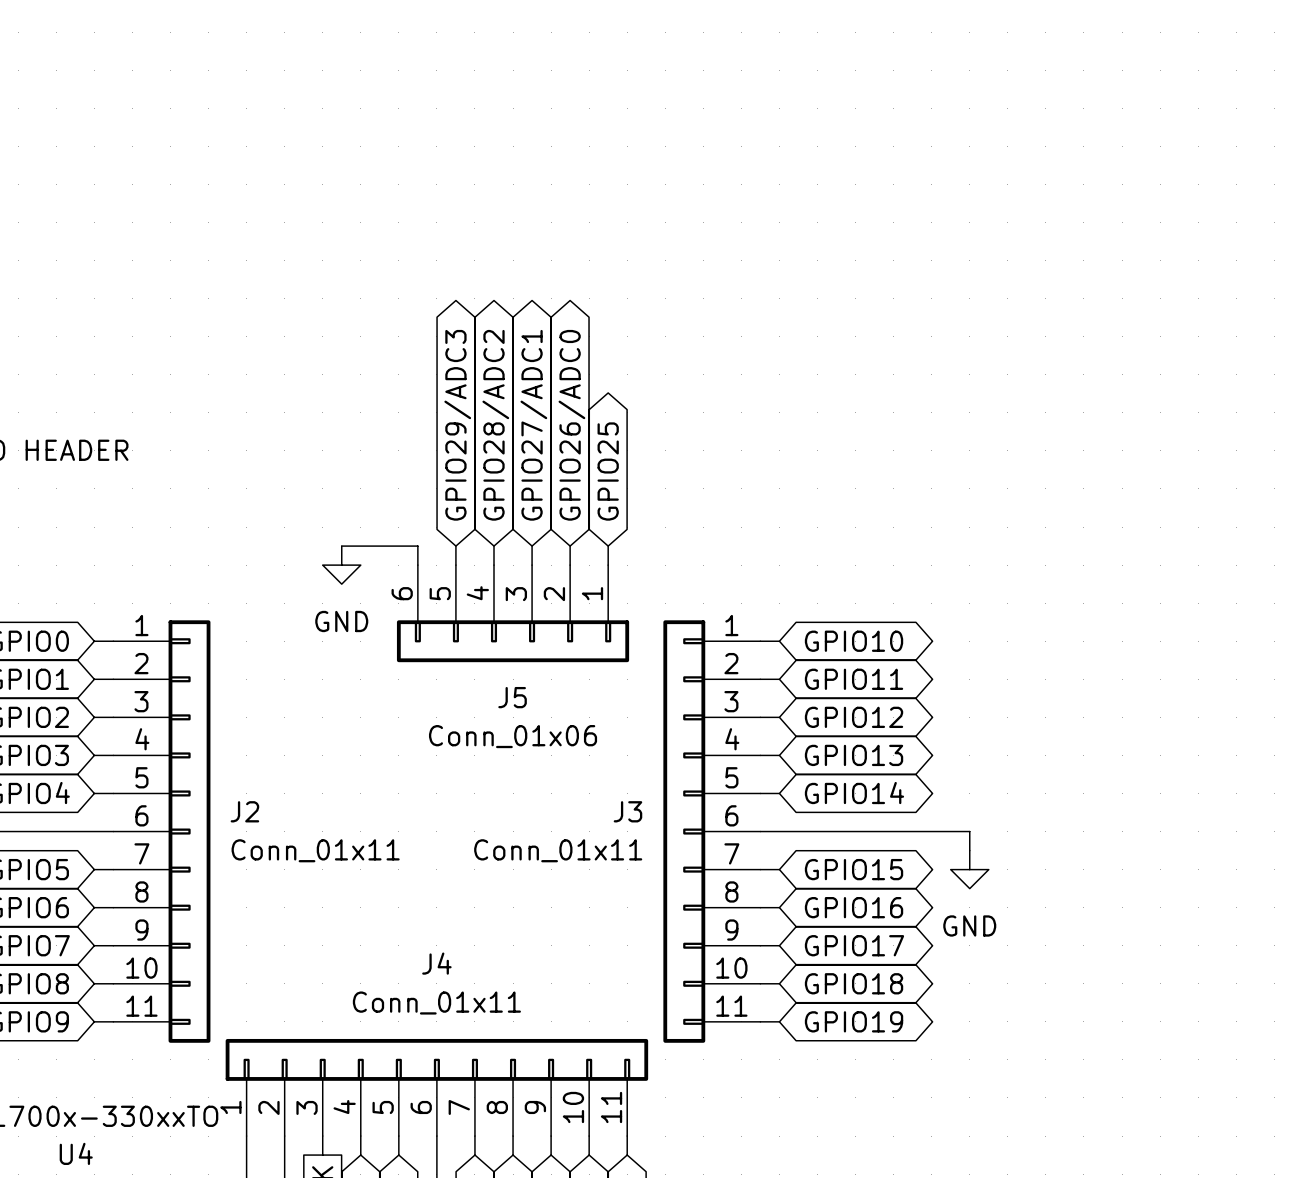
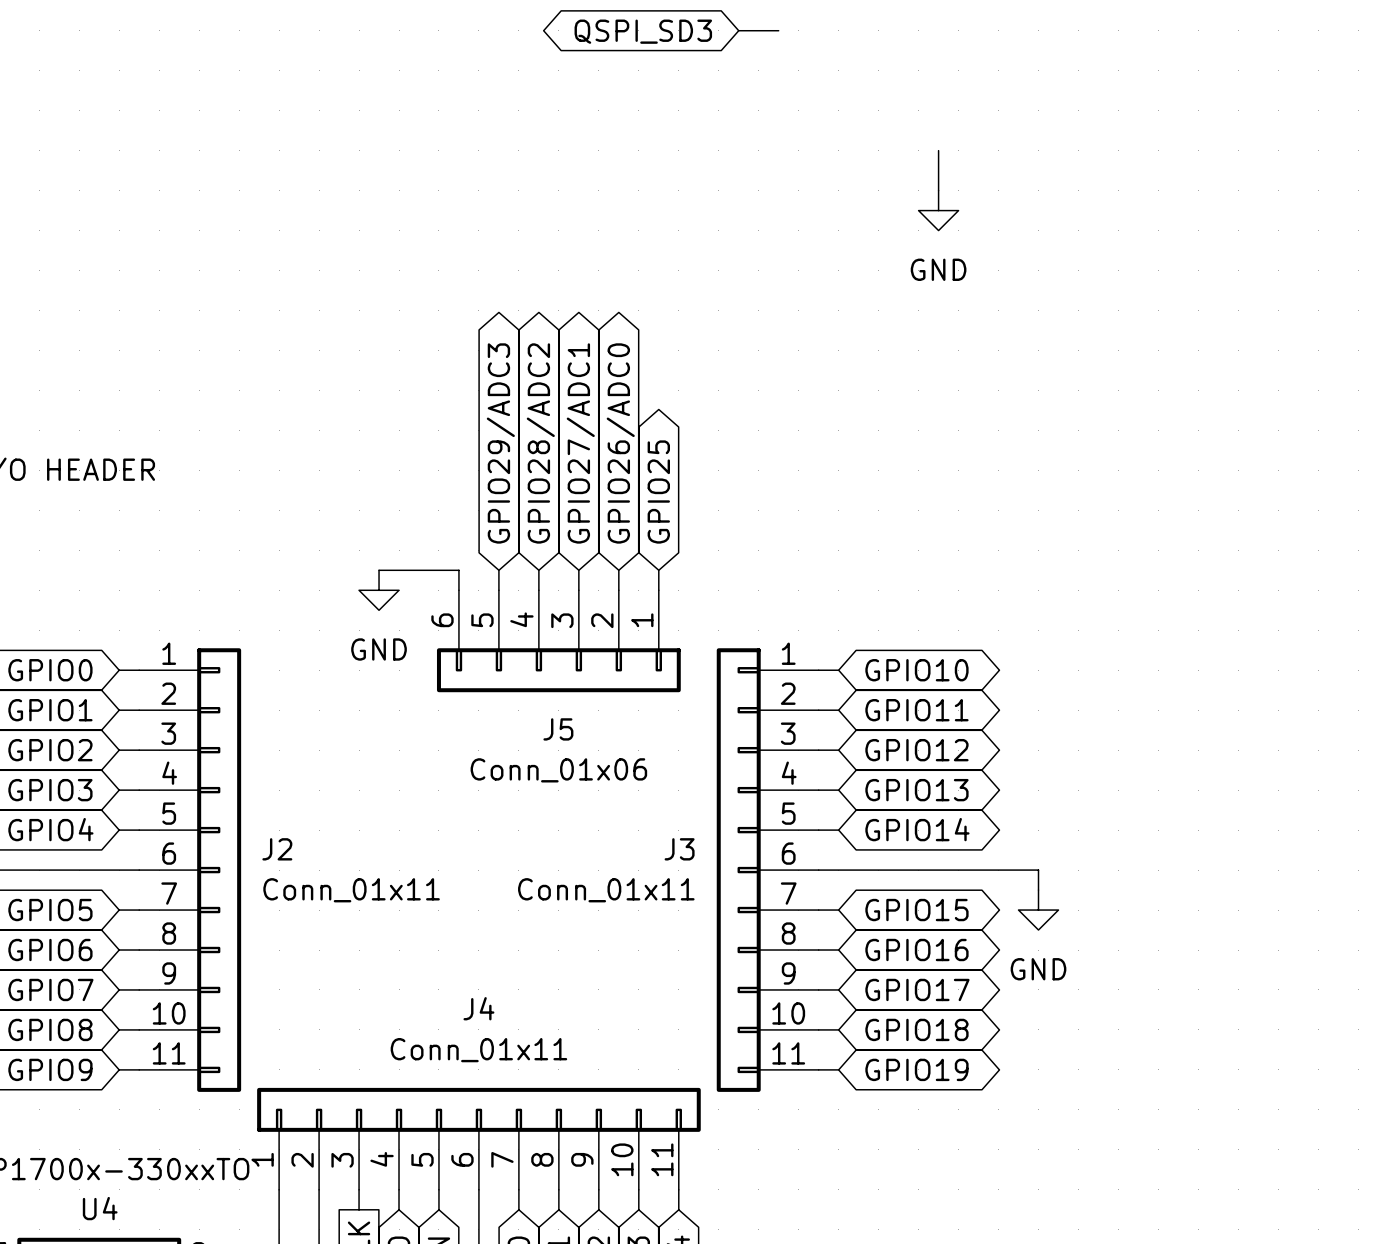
wire: none -> (738, 30) (778, 30)
global label: none -> QSPI_SD3 (643, 31)
wire: none -> (938, 150) (938, 190)
power symbol: none -> GND (938, 210)

